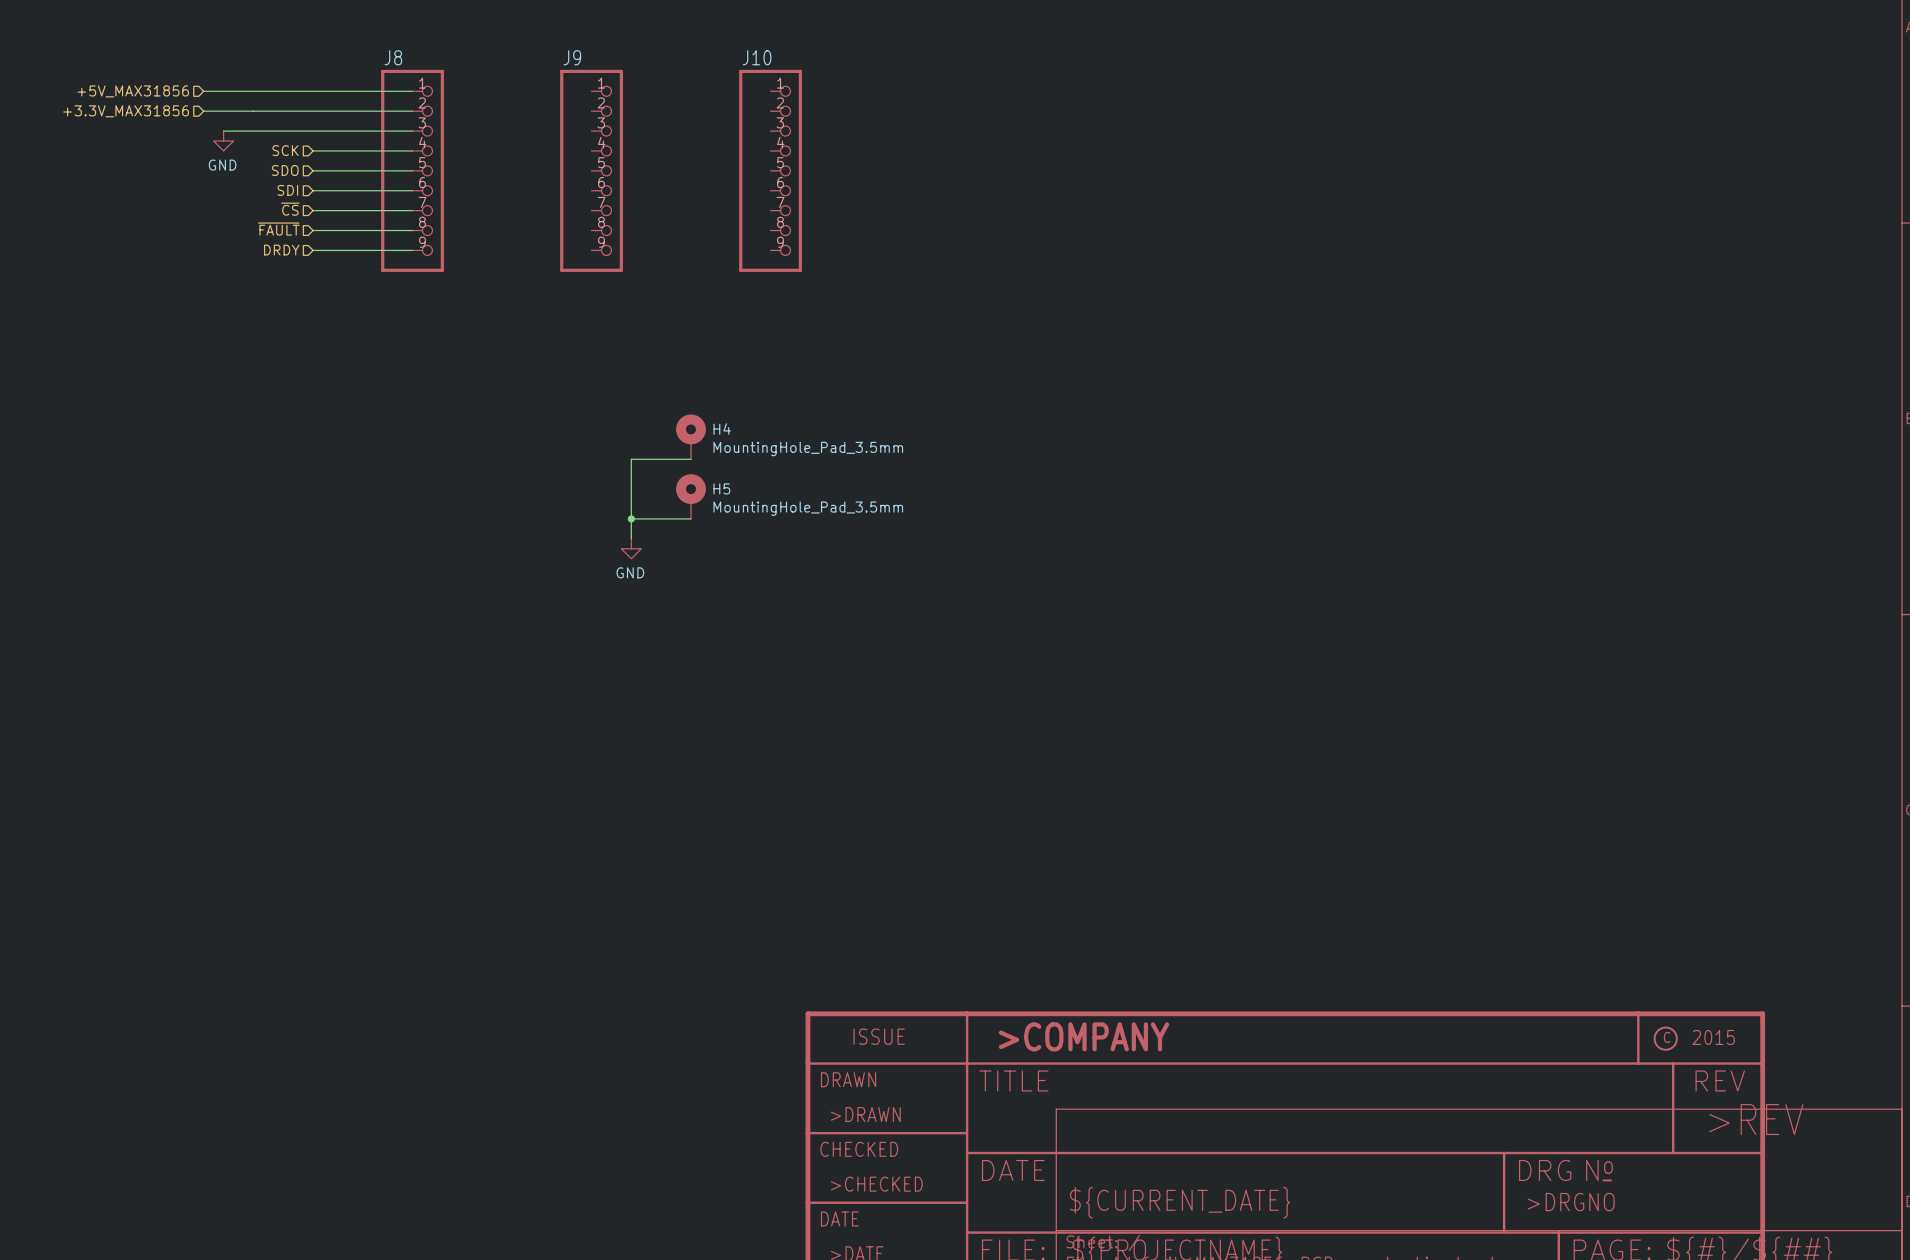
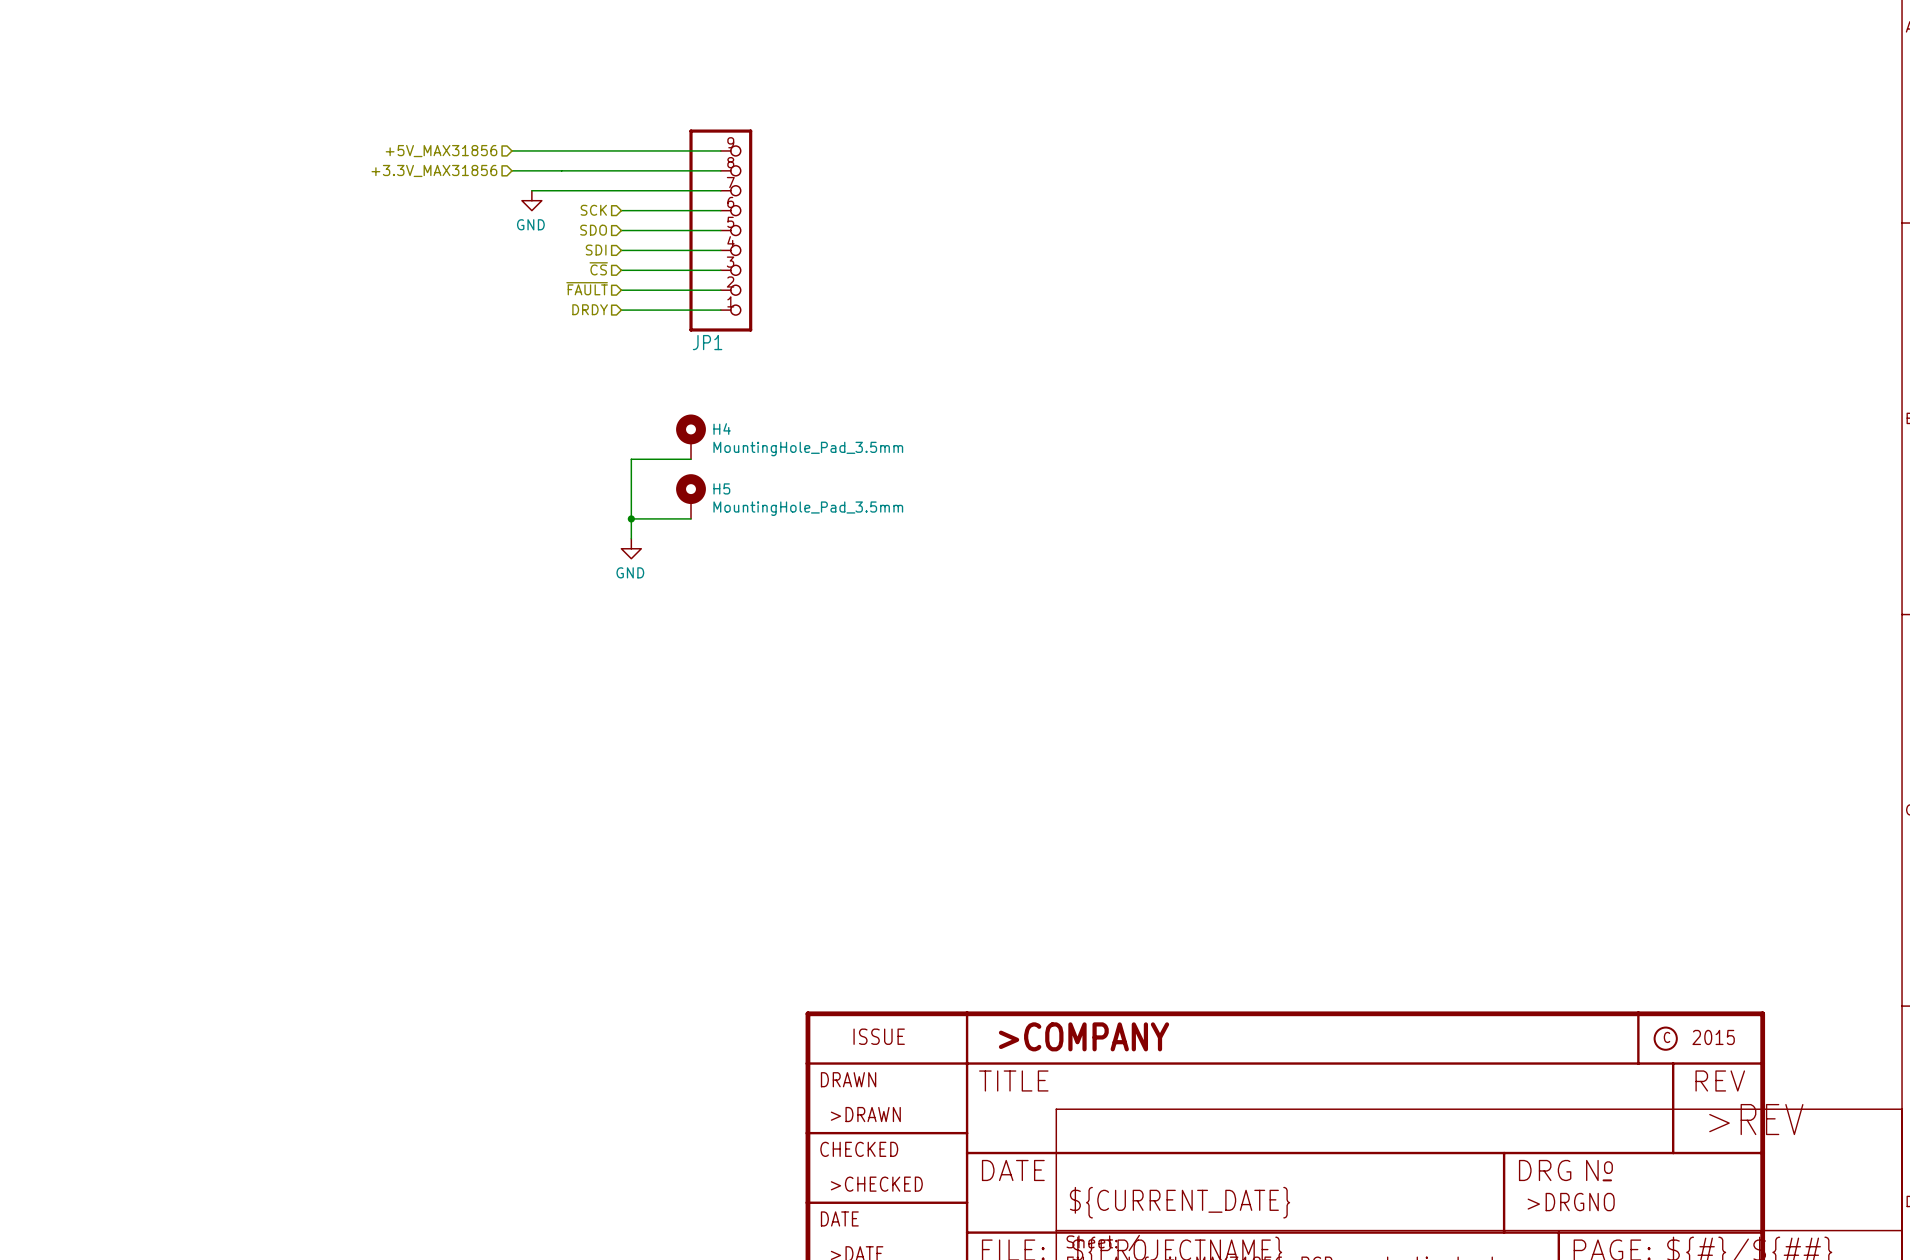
hierarchical label: +5V_MAX31856 (133, 91) -> none
wire: (203, 91) (412, 91) -> none
hierarchical label: +3.3V_MAX31856 (126, 111) -> none
wire: (203, 111) (412, 111) -> none
wire: (223, 131) (412, 131) -> none
power symbol: GND (223, 141) -> none
hierarchical label: SCK (285, 150) -> none
wire: (313, 150) (412, 150) -> none
wire: none -> (511, 150) (720, 150)
hierarchical label: none -> +5V_MAX31856 (441, 151)
hierarchical label: SDO (285, 170) -> none
wire: (313, 170) (412, 170) -> none
J8: (412, 170) -> none
hierarchical label: none -> +3.3V_MAX31856 (434, 170)
wire: none -> (511, 170) (720, 170)
J9: (591, 170) -> none
J10: (770, 170) -> none
hierarchical label: SDI (287, 190) -> none
wire: (313, 190) (412, 190) -> none
wire: none -> (531, 190) (720, 190)
power symbol: none -> GND (531, 200)
hierarchical label: ~{CS} (290, 209) -> none
wire: (313, 210) (412, 210) -> none
hierarchical label: none -> SCK (593, 210)
wire: none -> (621, 210) (720, 210)
hierarchical label: ~{FAULT} (278, 229) -> none
wire: (313, 230) (412, 230) -> none
hierarchical label: none -> SDO (593, 230)
wire: none -> (621, 230) (720, 230)
JP1: none -> (720, 230)
hierarchical label: DRDY (281, 250) -> none
wire: (313, 250) (412, 250) -> none
hierarchical label: none -> SDI (596, 250)
wire: none -> (621, 250) (720, 250)
hierarchical label: none -> ~{CS} (598, 268)
wire: none -> (621, 270) (720, 270)
hierarchical label: none -> ~{FAULT} (587, 288)
wire: none -> (621, 290) (720, 290)
hierarchical label: none -> DRDY (590, 309)
wire: none -> (621, 310) (720, 310)

